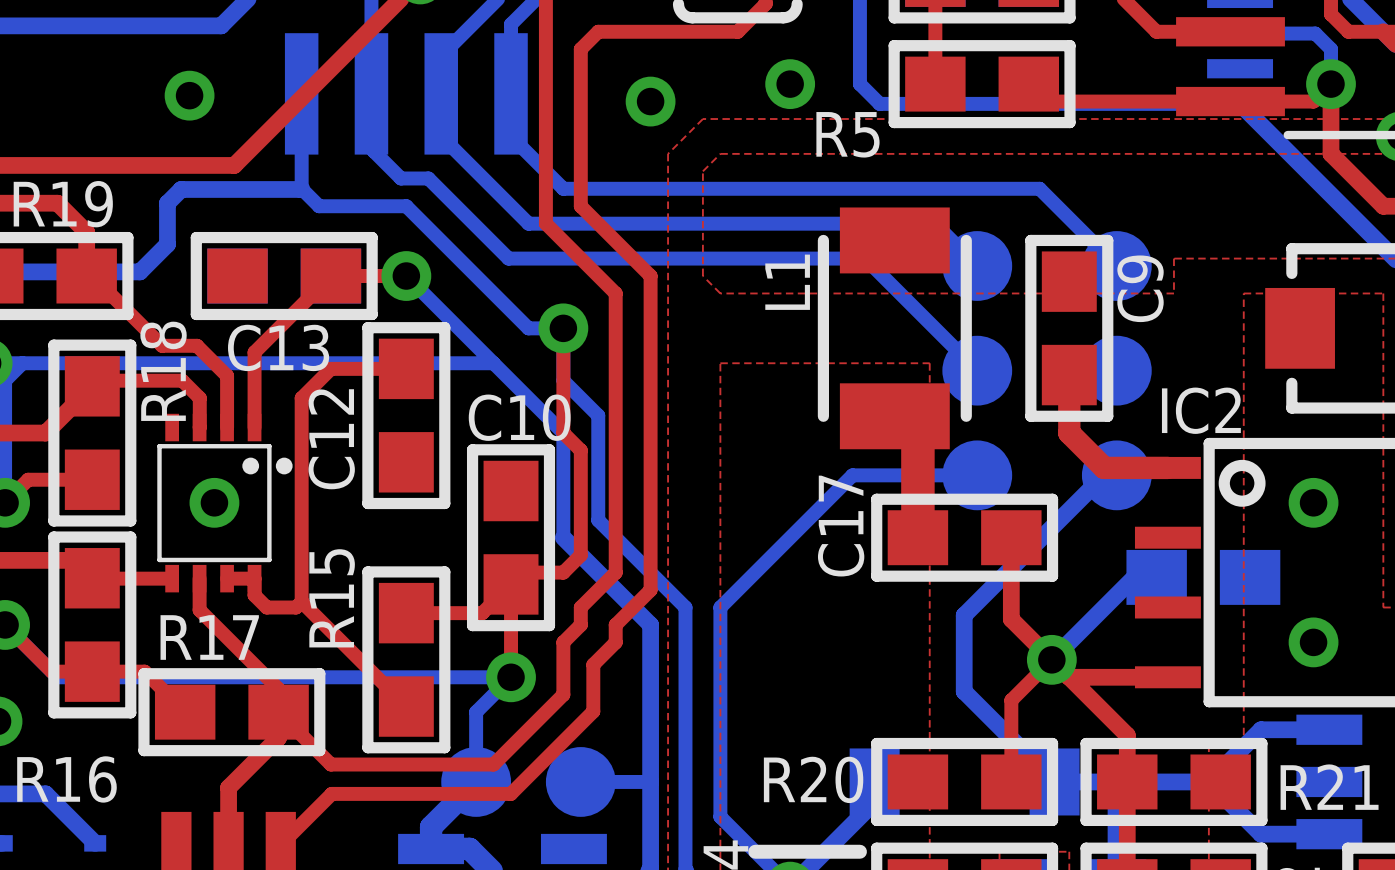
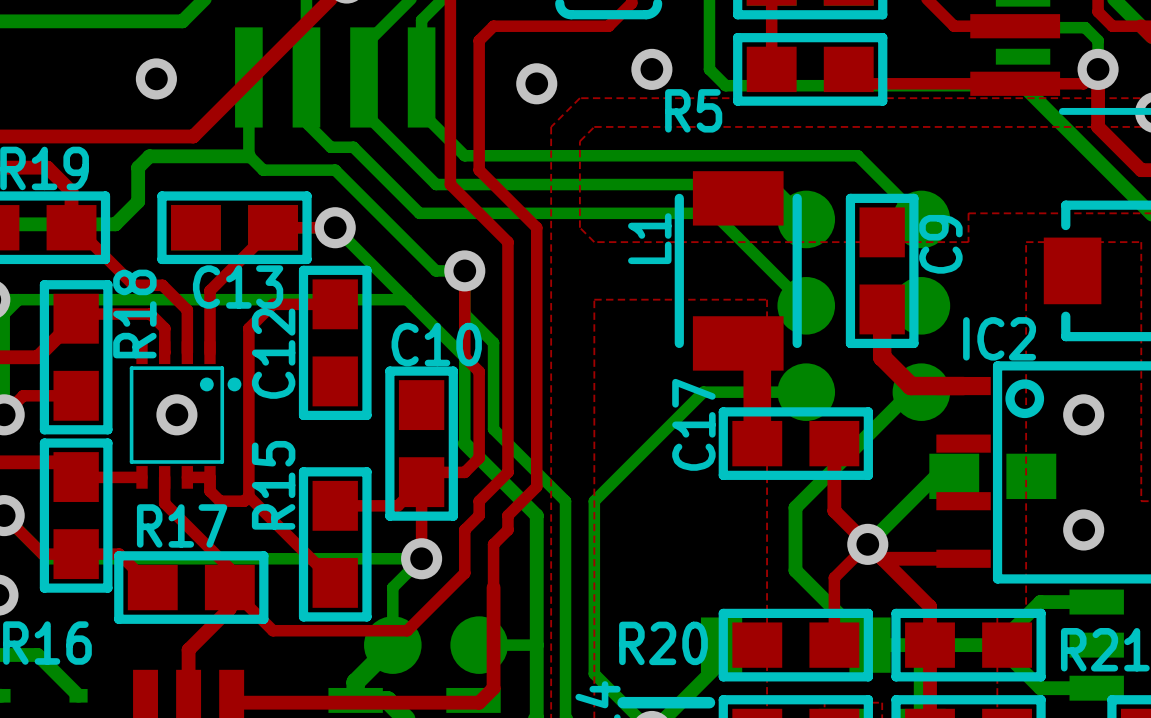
top track: (598, 659) (593, 664) (593, 711) (510, 793) (331, 793) (280, 844) -> (493, 544) (493, 688) (479, 702) (237, 702) (231, 697)

